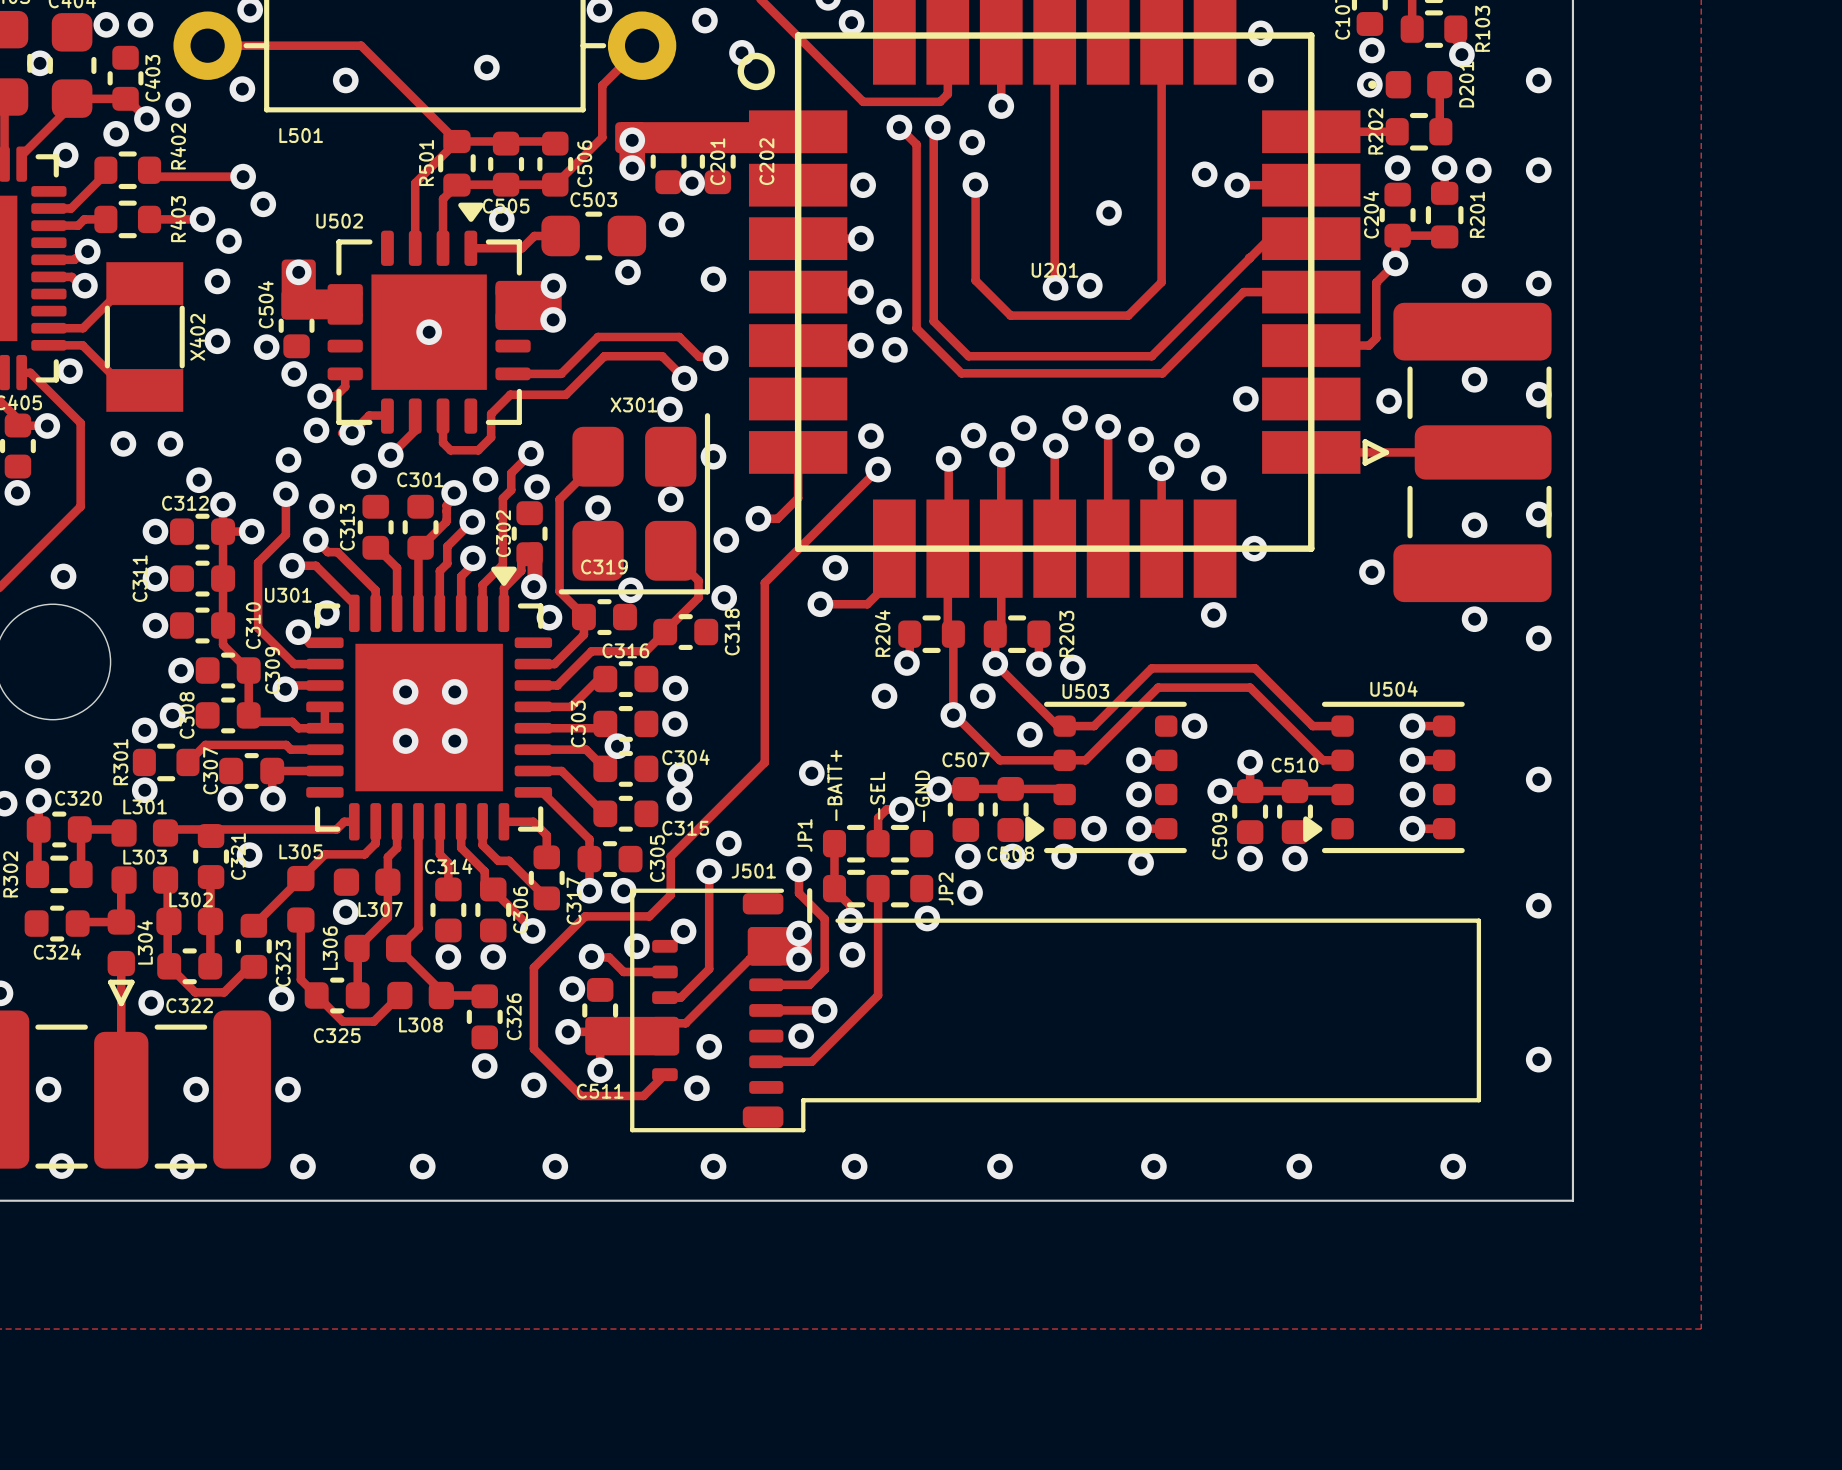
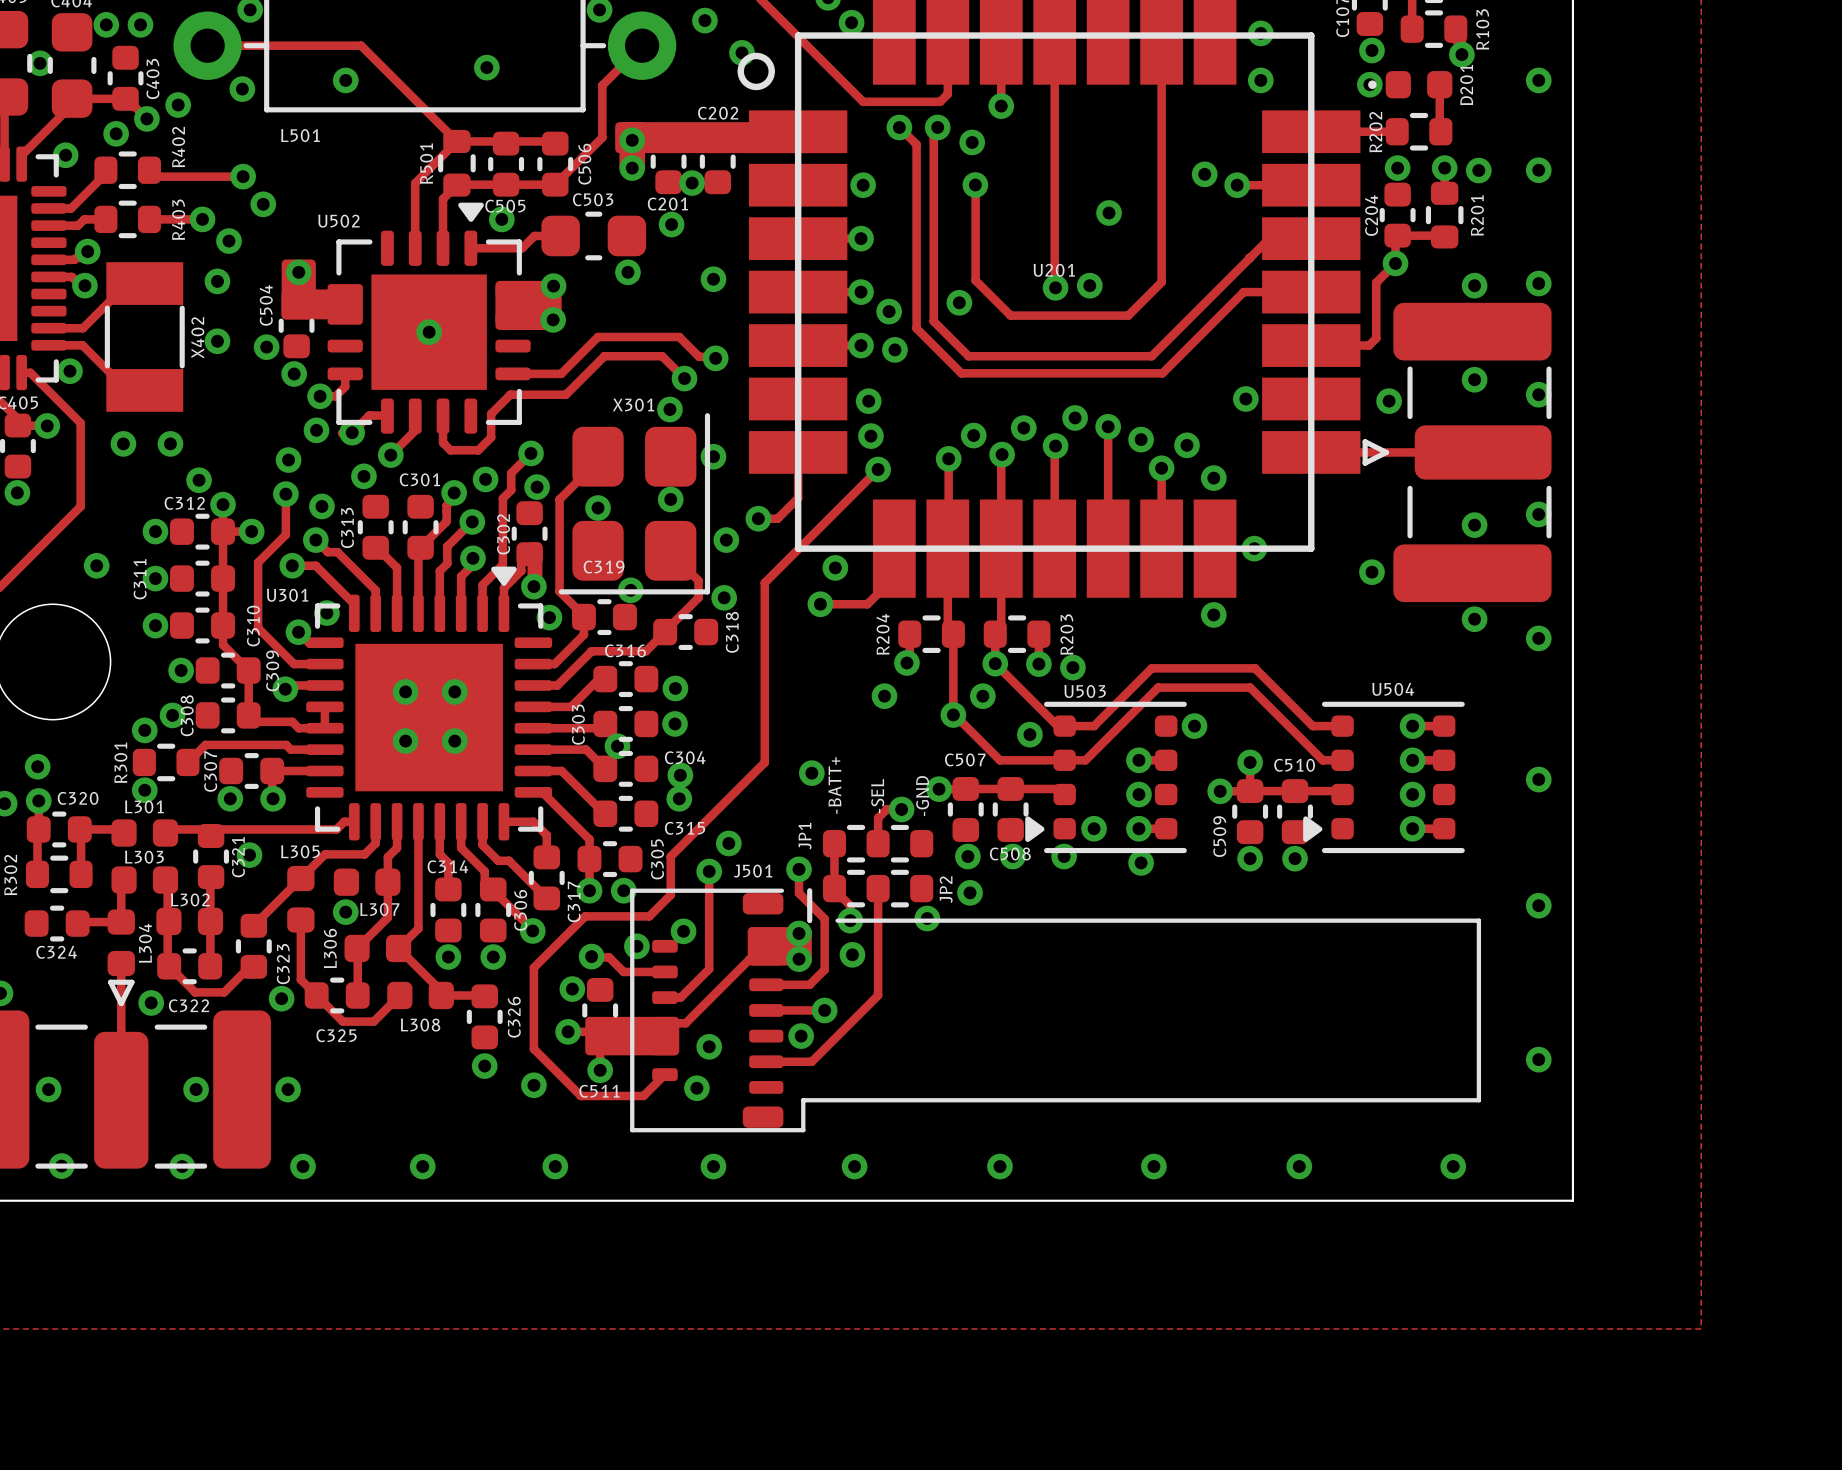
C201 name rotation: 0° (717, 161) -> 90° clockwise (667, 204)
C201 name position: C201 (717, 161) -> C201 (667, 204)
C202 name rotation: 0° (766, 161) -> 90° clockwise (718, 113)
C202 name position: C202 (766, 161) -> C202 (718, 113)
via: none -> (959, 302)
via: none -> (868, 401)
via position: (63, 576) -> (96, 565)

